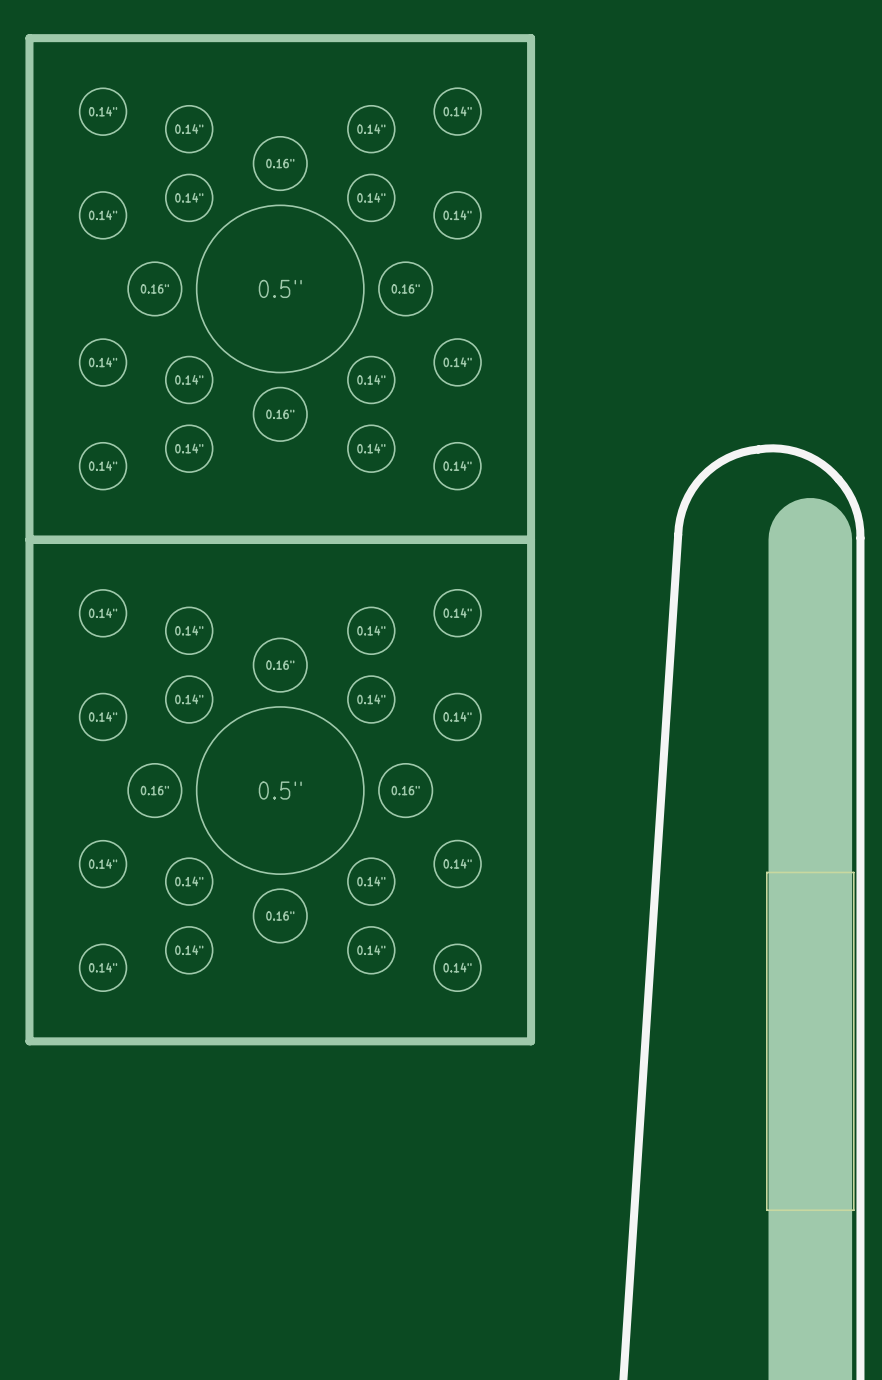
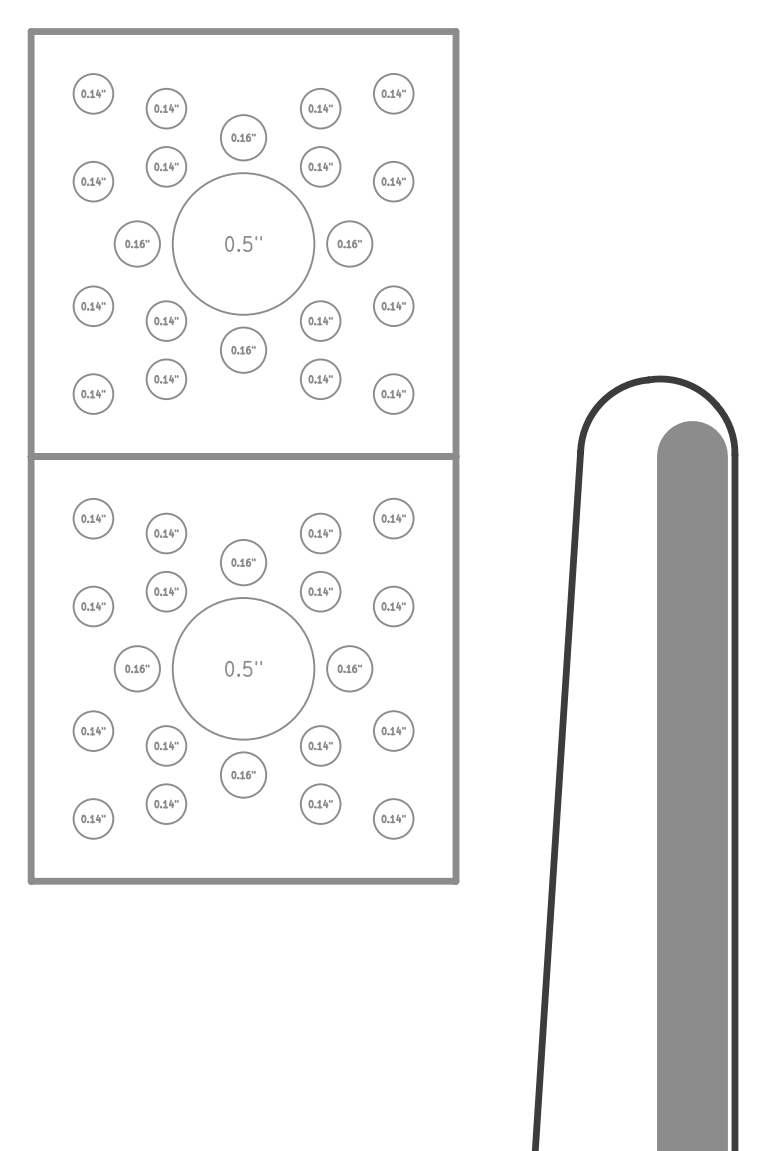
drawing: [766, 872, 854, 1211] -> none

